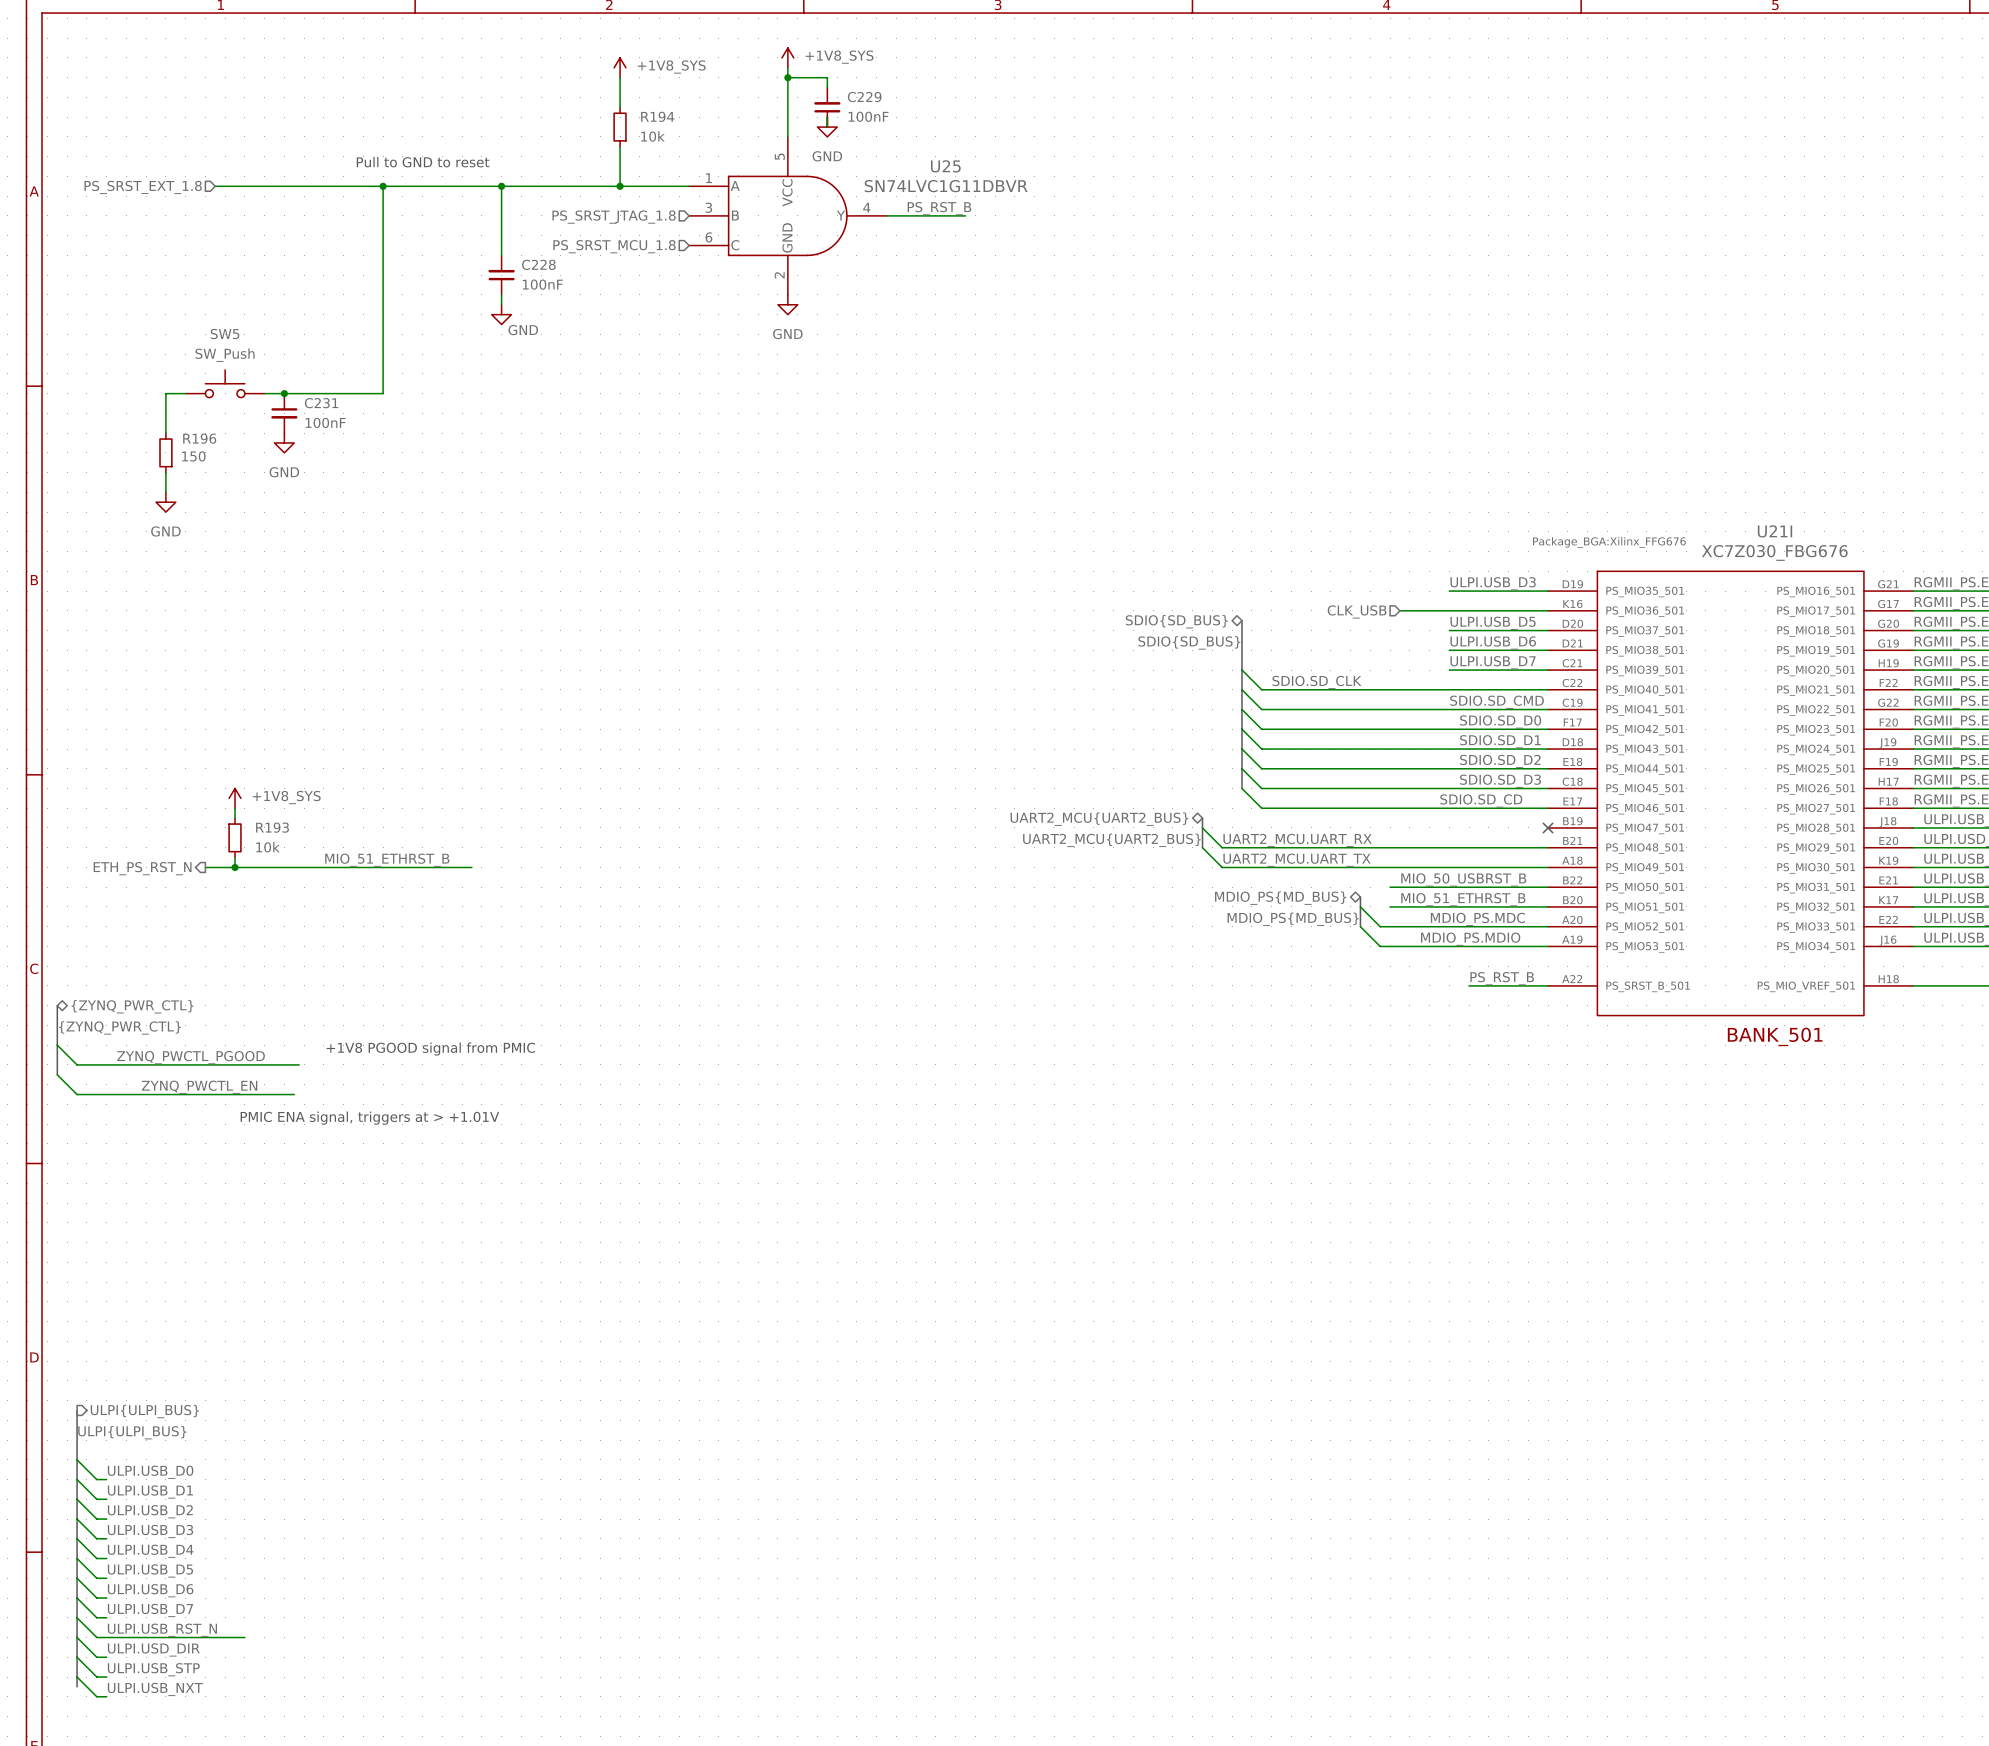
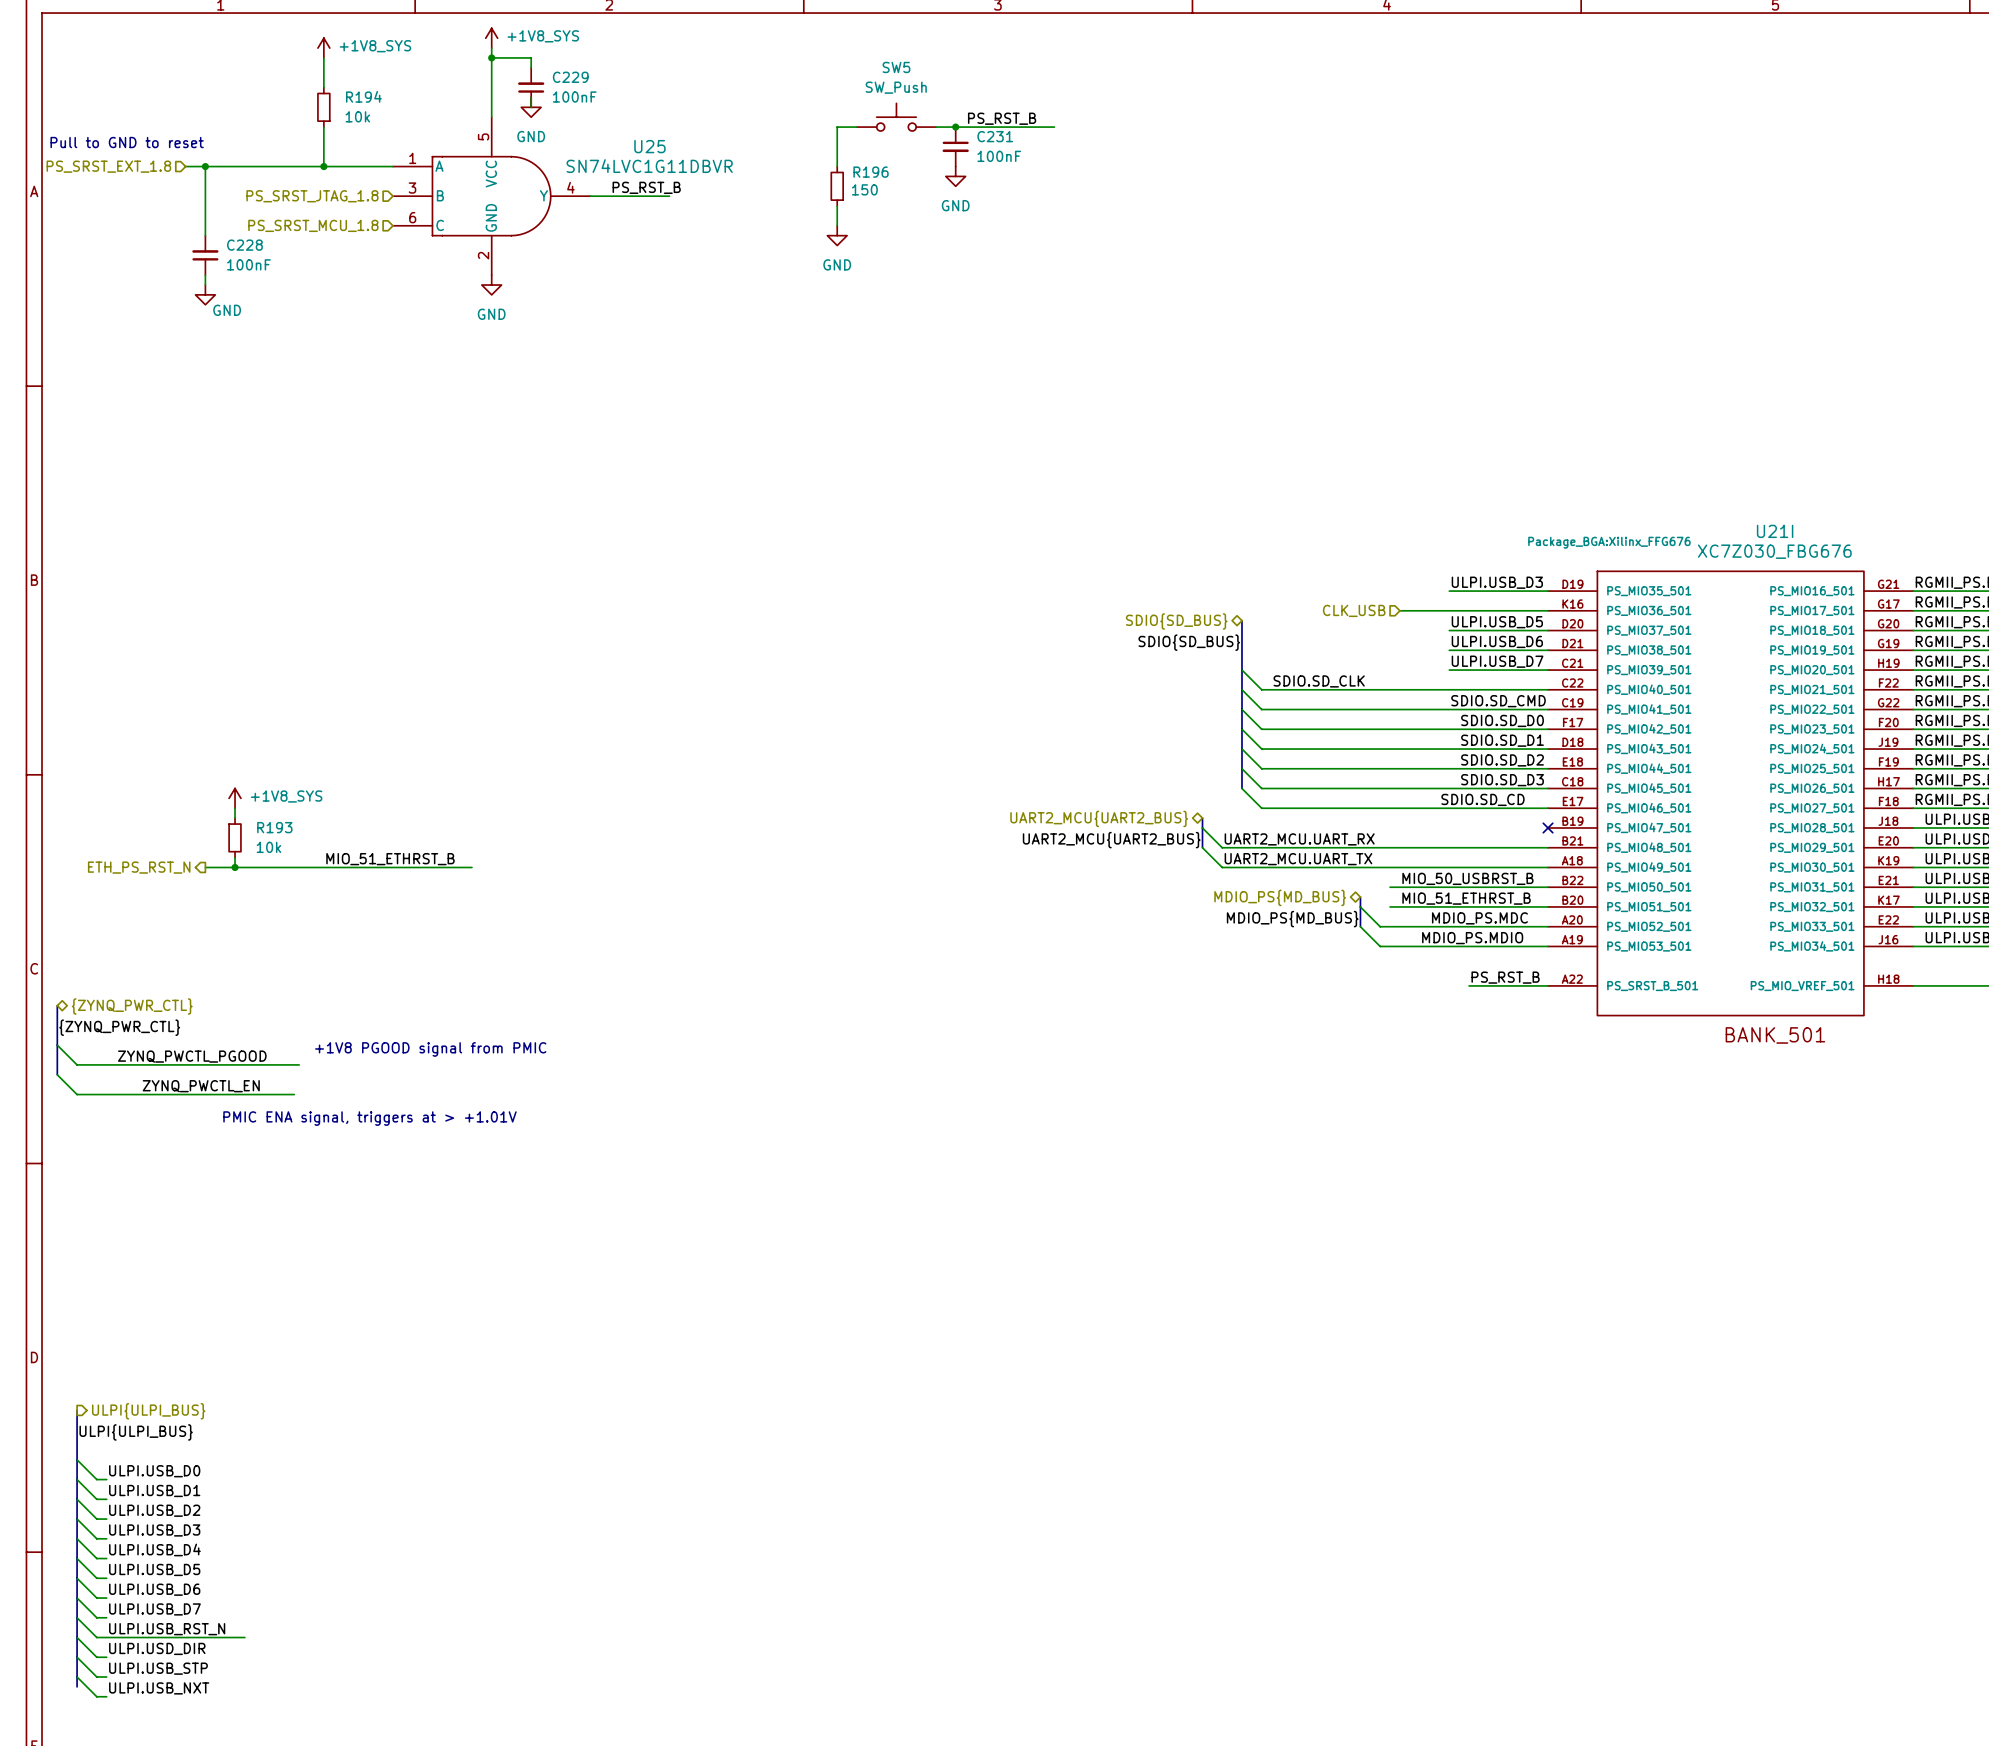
power symbol: none -> +1V8_SYS (323, 48)
wire: none -> (323, 57) (323, 87)
wire: none -> (491, 57) (531, 57) (531, 67)
junction: none -> (491, 57)
power symbol: +1V8_SYS (787, 57) -> none
power symbol position: +1V8_SYS (620, 67) -> +1V8_SYS (491, 38)
wire: (787, 67) (787, 136) -> none
wire: (620, 77) (620, 107) -> none
wire: (787, 77) (827, 77) (827, 87) -> none
junction: (787, 77) -> none
wire: none -> (531, 97) (531, 107)
power symbol: none -> GND (531, 107)
C229 position: (827, 107) -> (531, 87)
wire: (827, 117) (827, 127) -> none
wire: none -> (323, 127) (323, 166)
R194 position: (620, 127) -> (323, 107)
power symbol: GND (827, 127) -> none
wire: none -> (856, 127) (837, 127) (837, 166)
wire: none -> (935, 127) (1054, 127)
junction: none -> (955, 127)
text: none -> Pull to GND to reset (127, 142)
wire: (620, 146) (620, 186) -> none
text: Pull to GND to reset (423, 162) -> none
wire: none -> (185, 166) (392, 166)
wire: none -> (205, 166) (205, 235)
junction: none -> (205, 166)
junction: none -> (323, 166)
power symbol: none -> GND (955, 176)
wire: (215, 186) (689, 186) -> none
wire: (383, 186) (383, 393) (264, 393) -> none
junction: (383, 186) -> none
wire: (501, 186) (501, 255) -> (491, 48) (491, 117)
junction: (501, 186) -> none
junction: (620, 186) -> none
hierarchical label position: PS_SRST_EXT_1.8 (143, 187) -> PS_SRST_EXT_1.8 (108, 166)
label: none -> PS_RST_B (646, 187)
wire: none -> (590, 196) (669, 196)
hierarchical label: none -> PS_SRST_JTAG_1.8 (312, 196)
wire: none -> (837, 206) (837, 225)
label position: PS_RST_B (939, 208) -> PS_RST_B (1002, 118)
U25 position: (787, 215) -> (491, 196)
wire: (886, 215) (965, 215) -> none
hierarchical label: PS_SRST_JTAG_1.8 (614, 217) -> none
hierarchical label: none -> PS_SRST_MCU_1.8 (313, 225)
power symbol: none -> GND (837, 235)
hierarchical label: PS_SRST_MCU_1.8 (614, 246) -> none
wire: none -> (205, 275) (205, 285)
C228 position: (501, 275) -> (205, 255)
power symbol: none -> GND (205, 294)
wire: (501, 294) (501, 304) -> none
power symbol: GND (787, 304) -> none
power symbol position: GND (501, 314) -> GND (491, 285)
power symbol text position: GND (523, 330) -> GND (491, 314)
SW5 position: (225, 383) -> (896, 117)
wire: (185, 393) (165, 393) (165, 433) -> none
junction: (284, 393) -> none
C231 position: (284, 413) -> (955, 146)
power symbol: GND (284, 442) -> none
R196 position: (165, 452) -> (837, 186)
wire: (165, 472) (165, 492) -> none
power symbol: GND (165, 502) -> none

